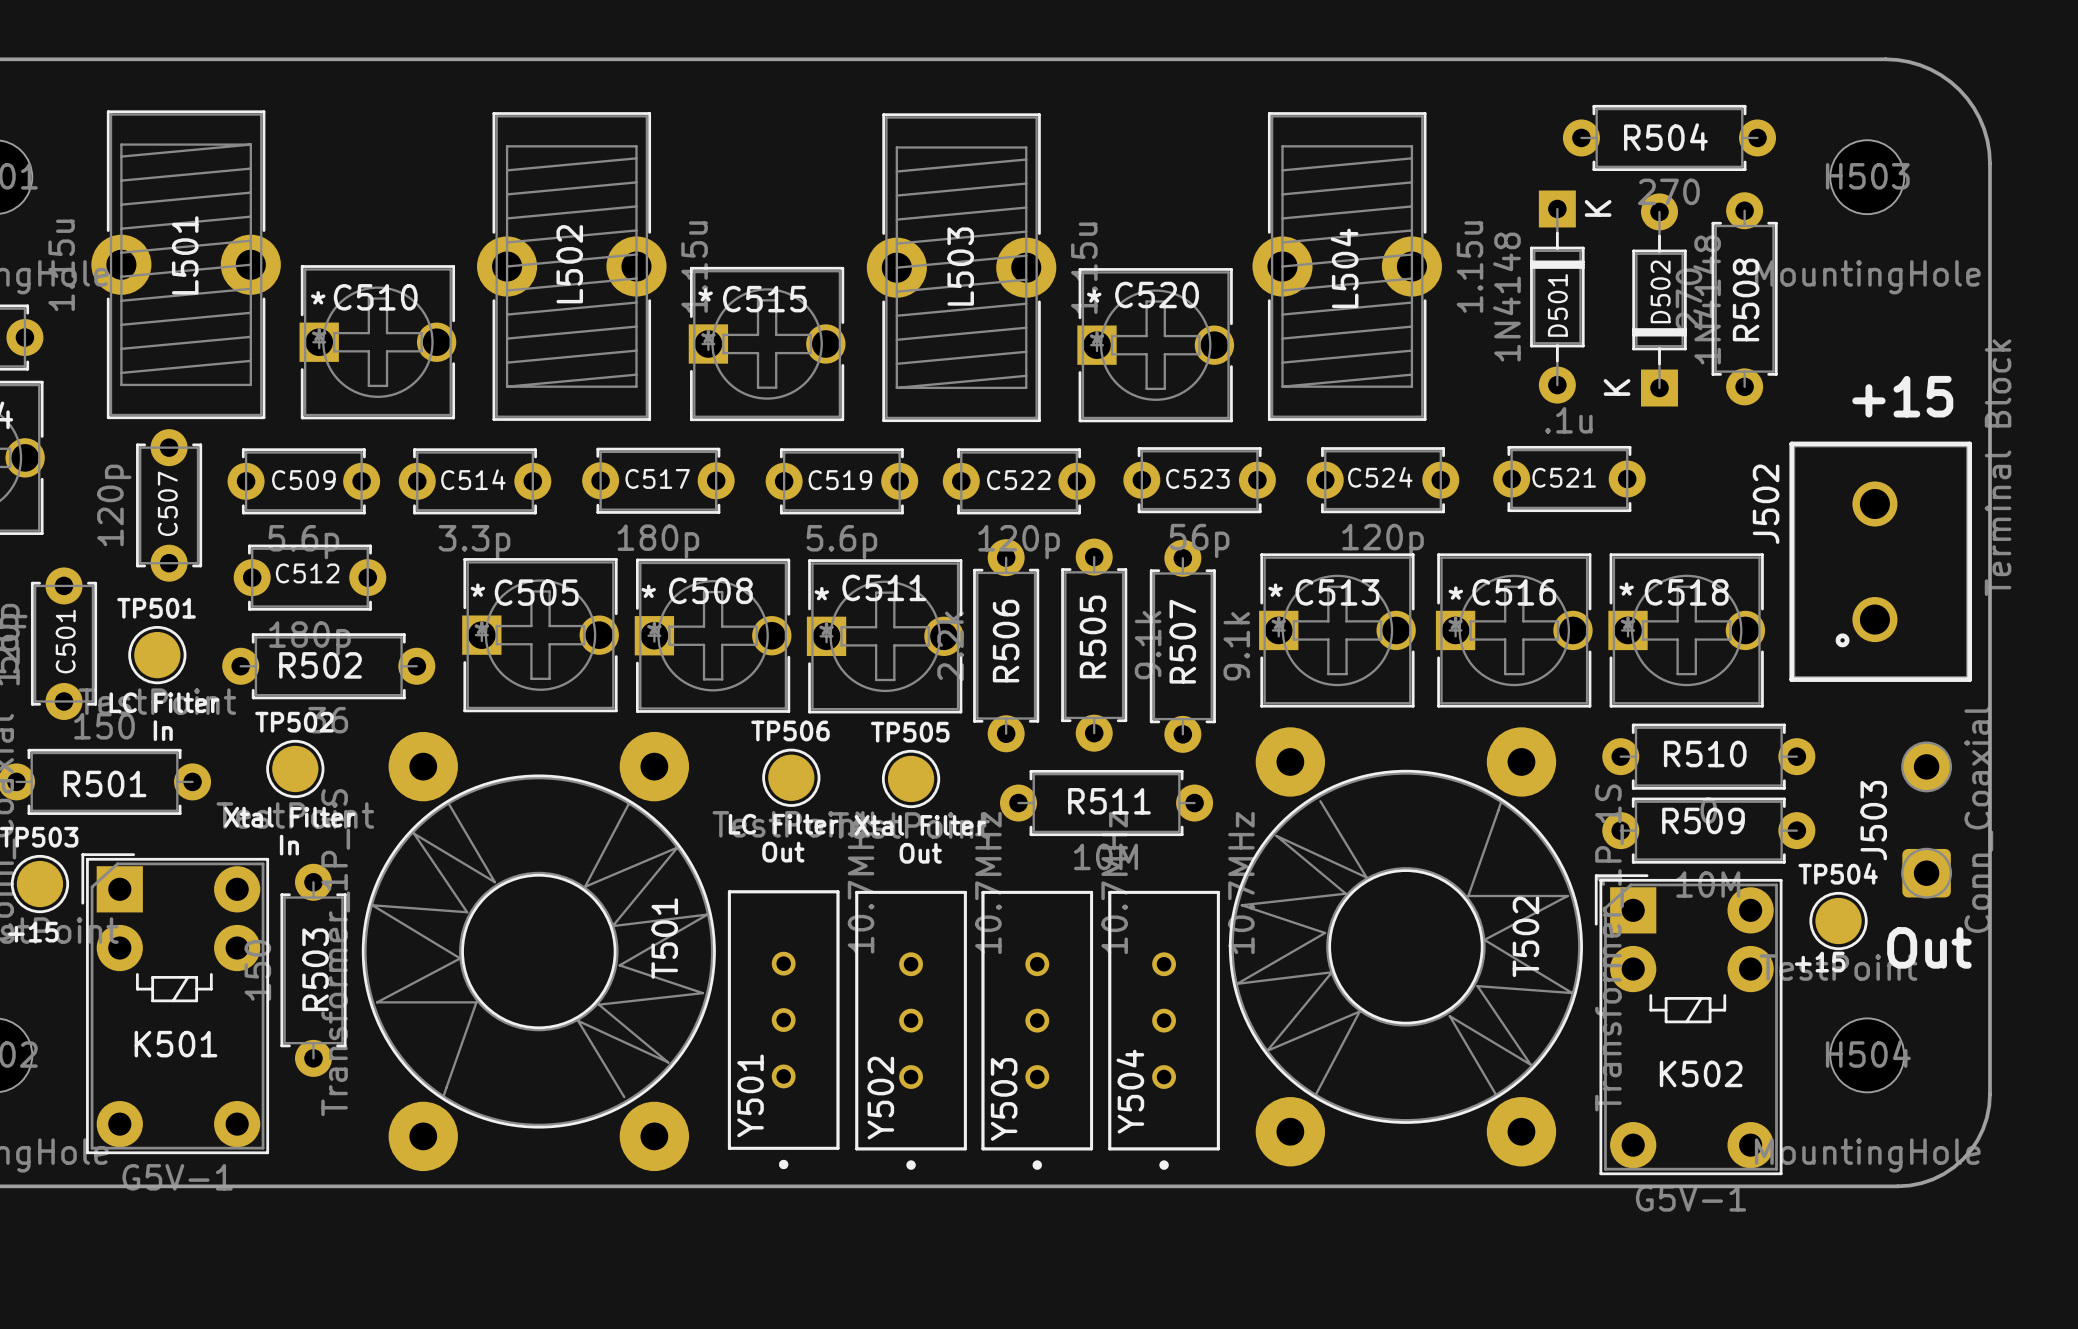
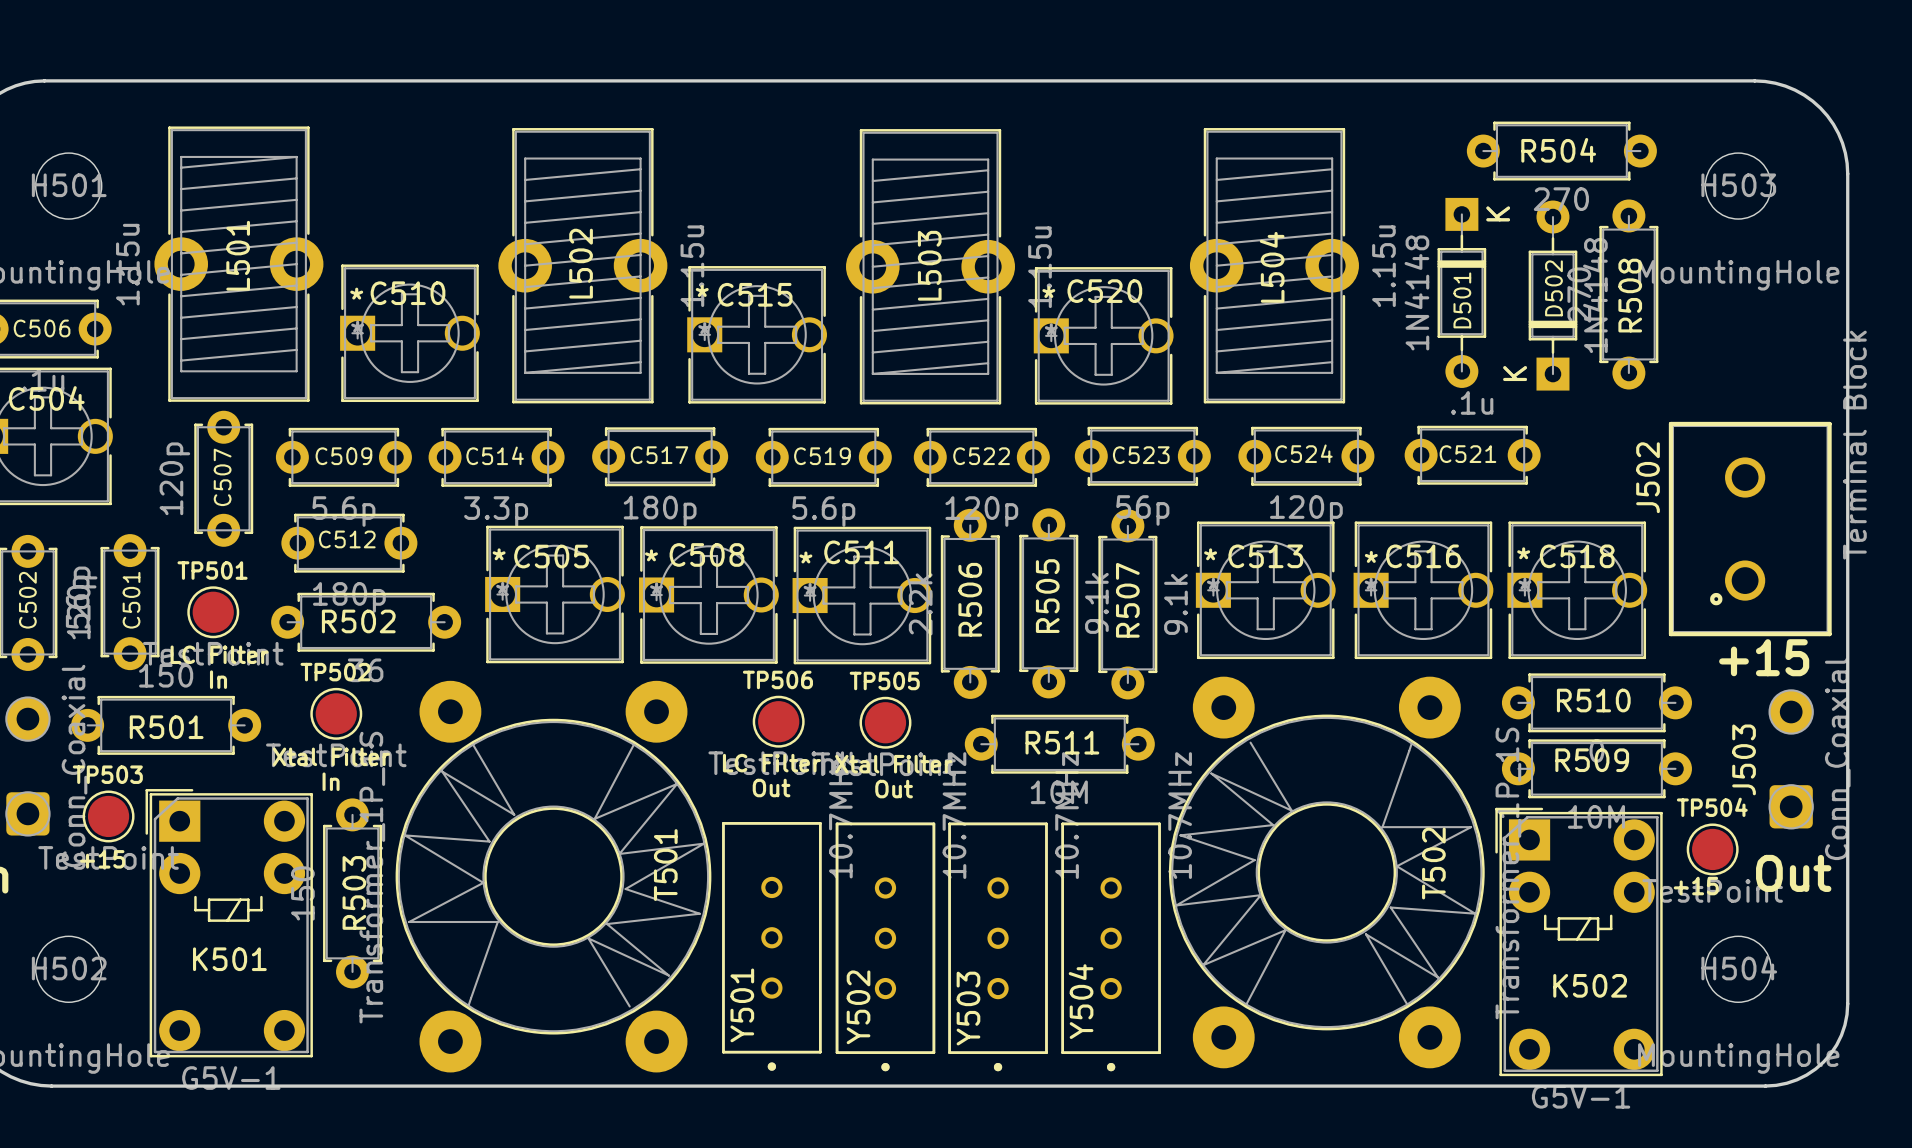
text position: +15 (1902, 396) -> +15 (1764, 657)

